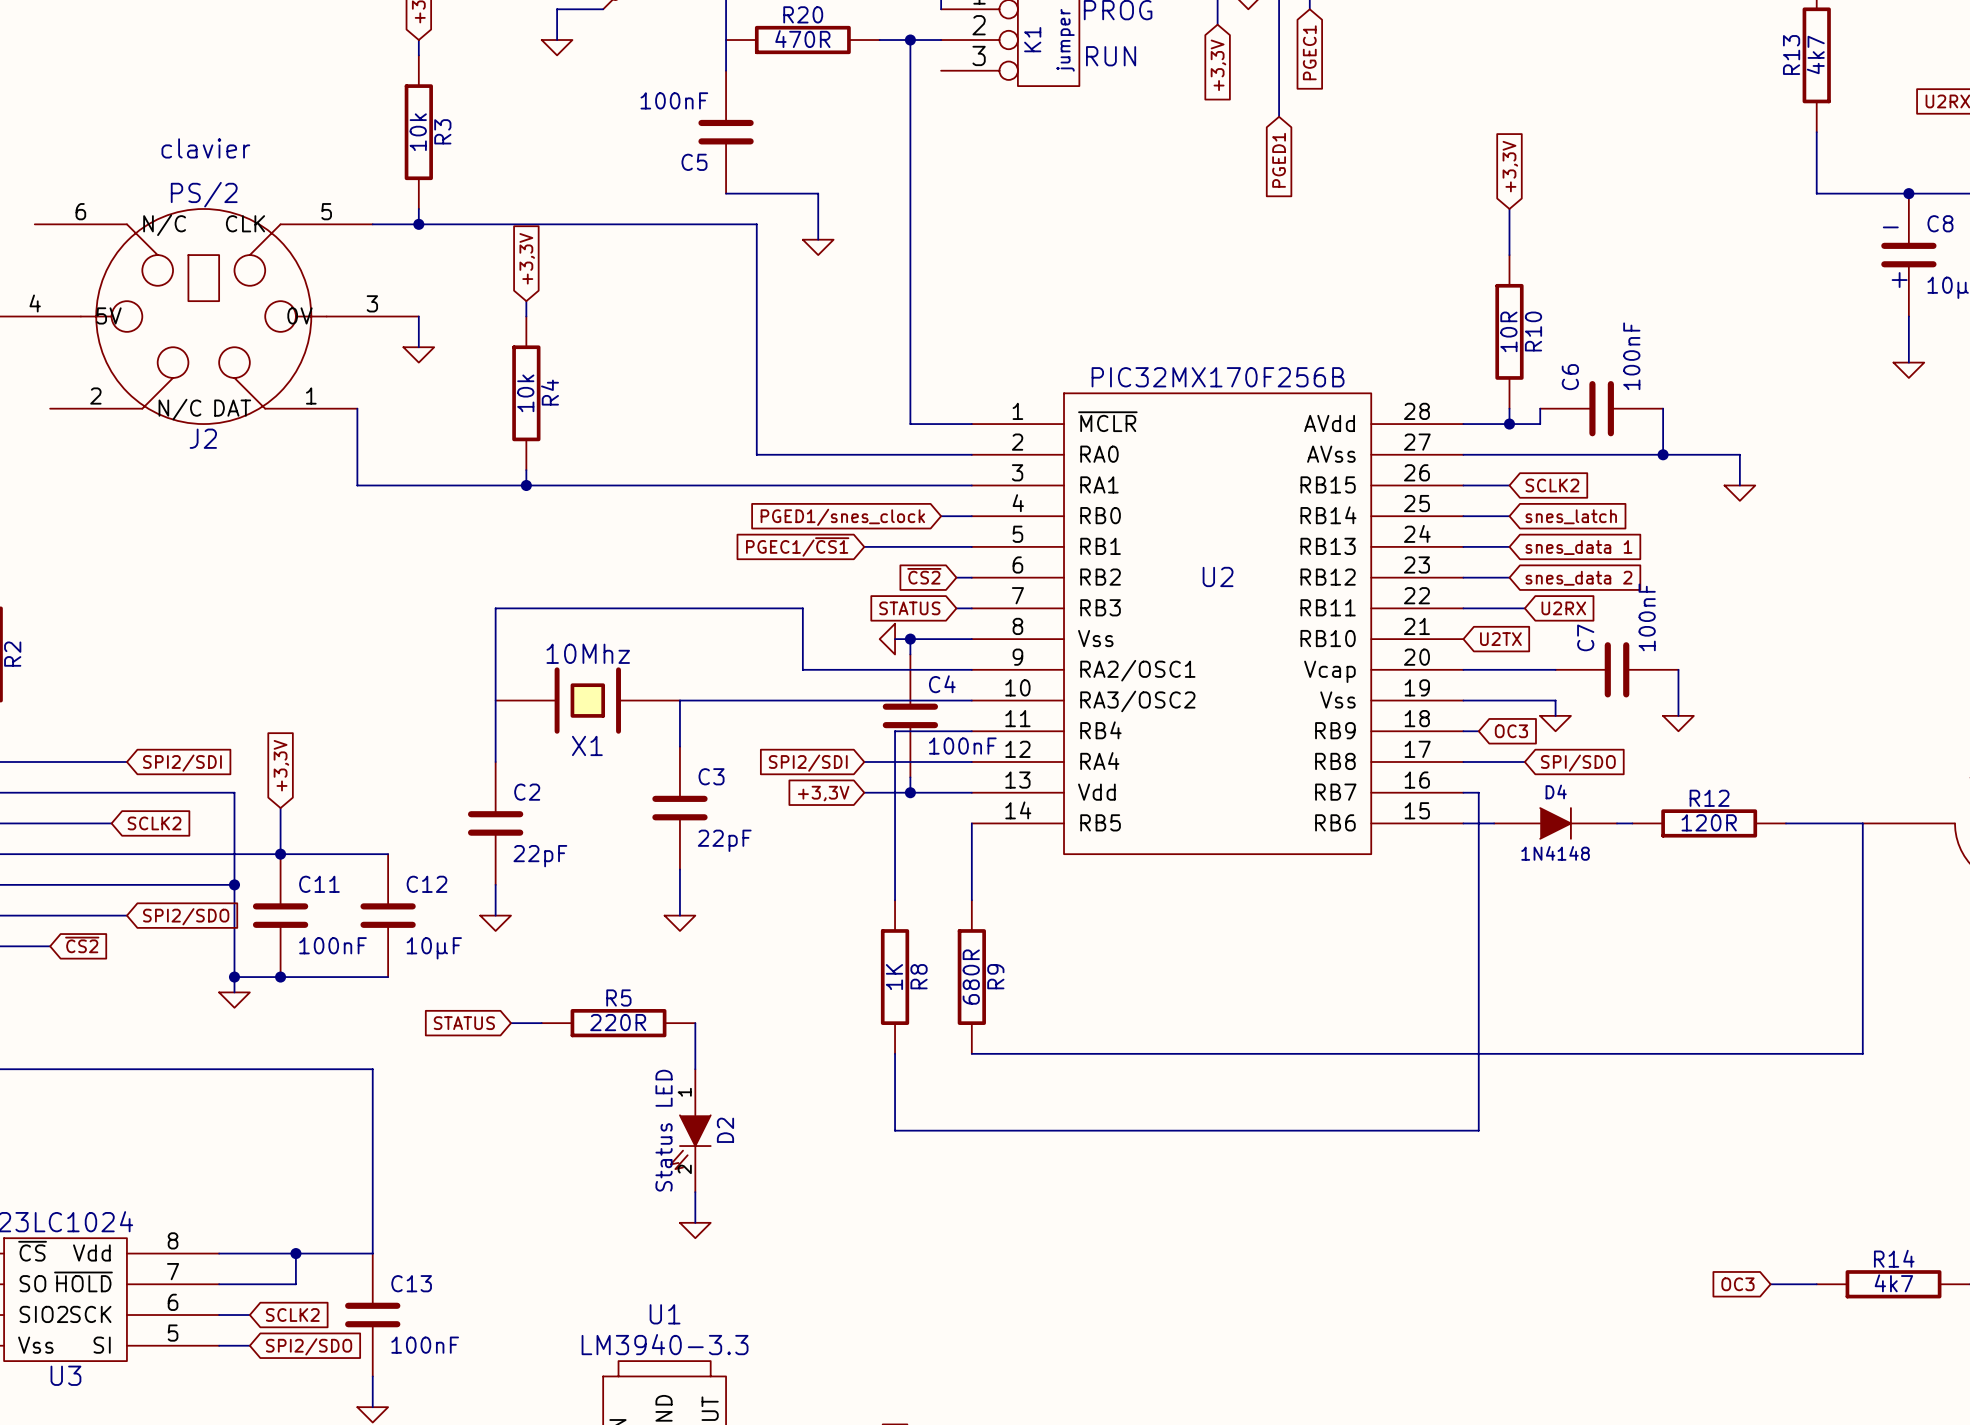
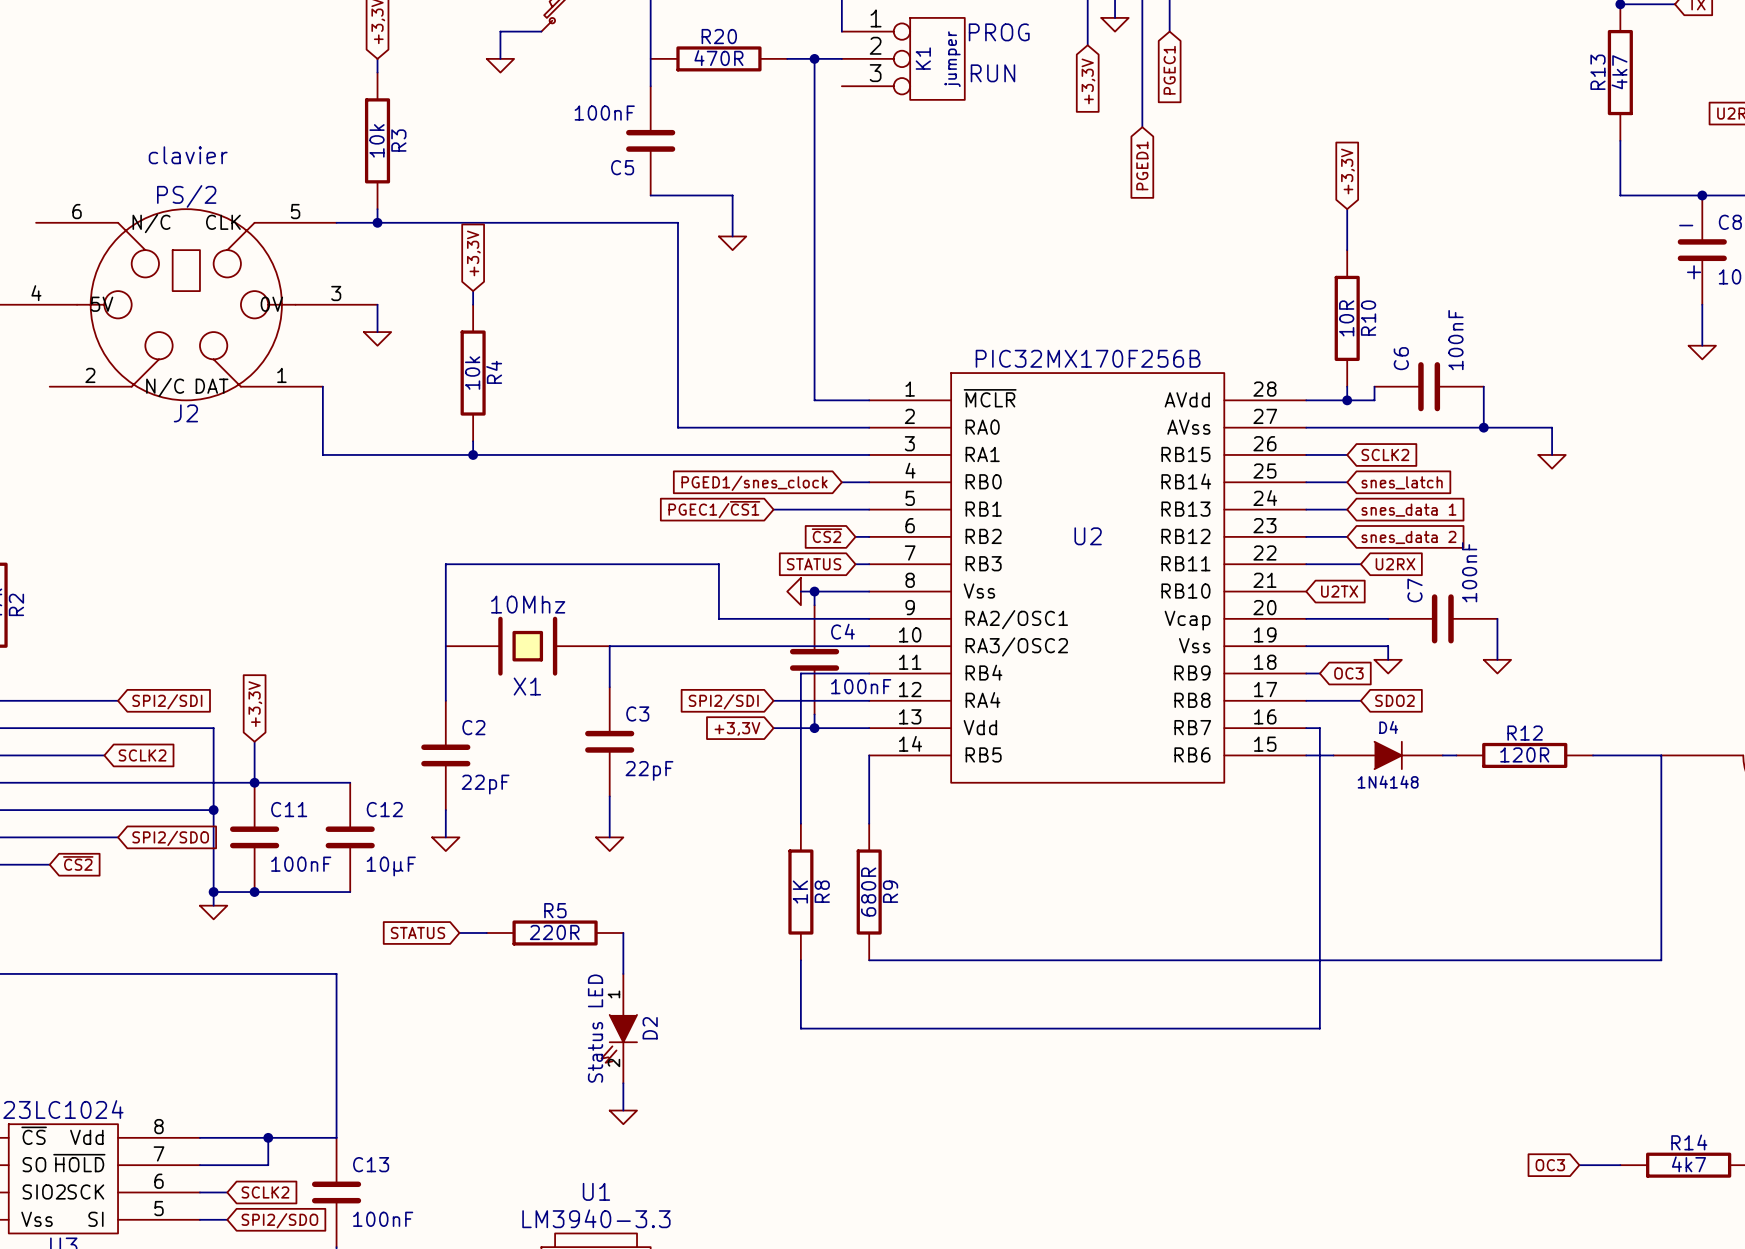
global label: SPI/SDO (1578, 763) -> SDO2 (1394, 700)

